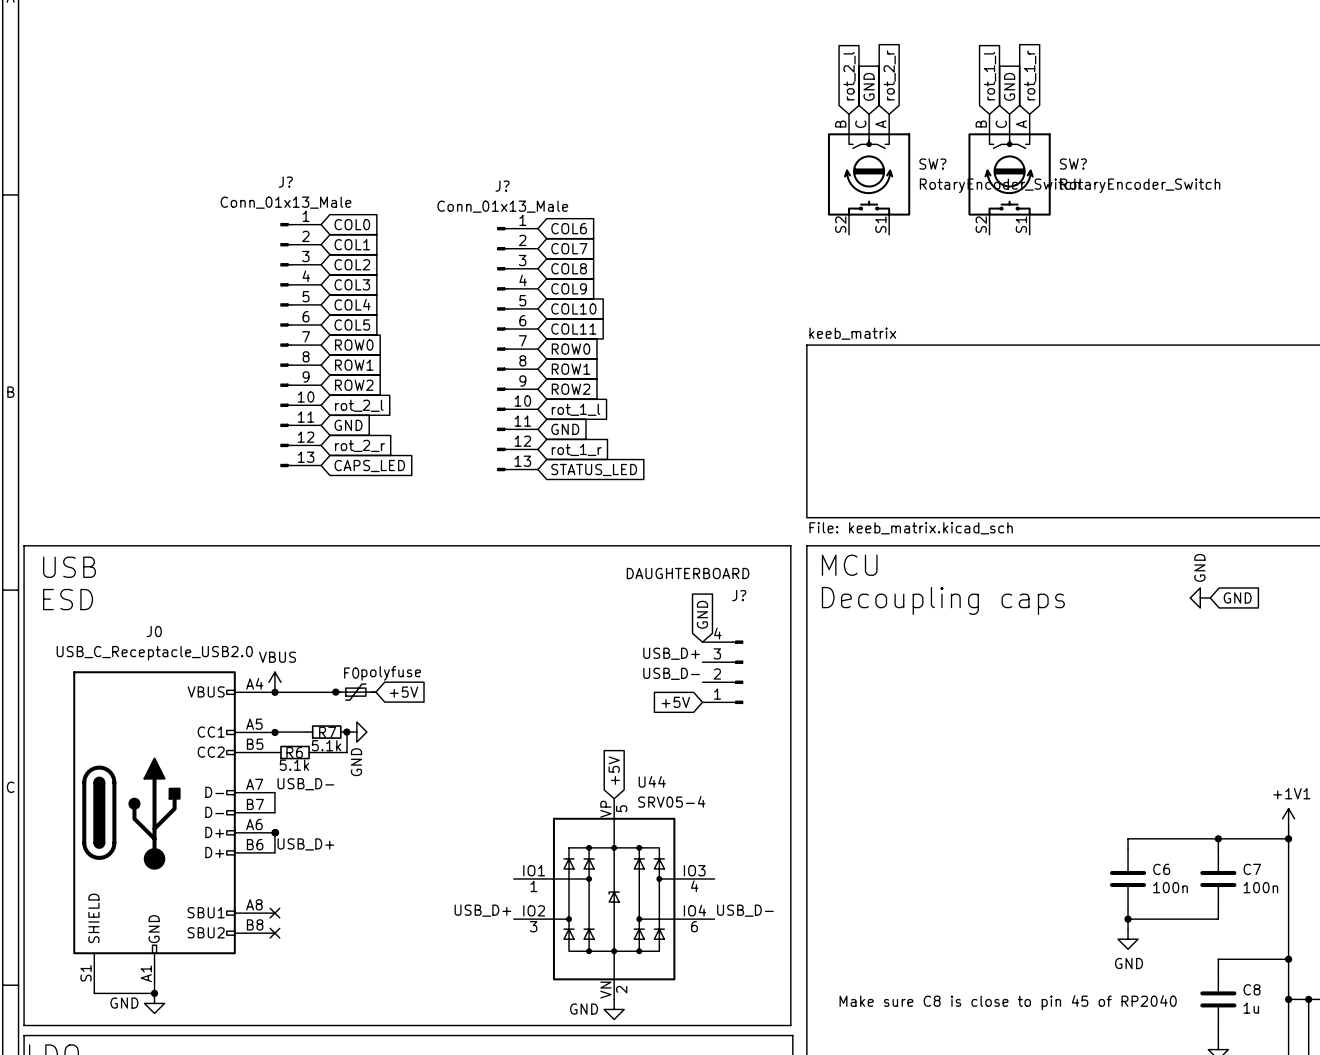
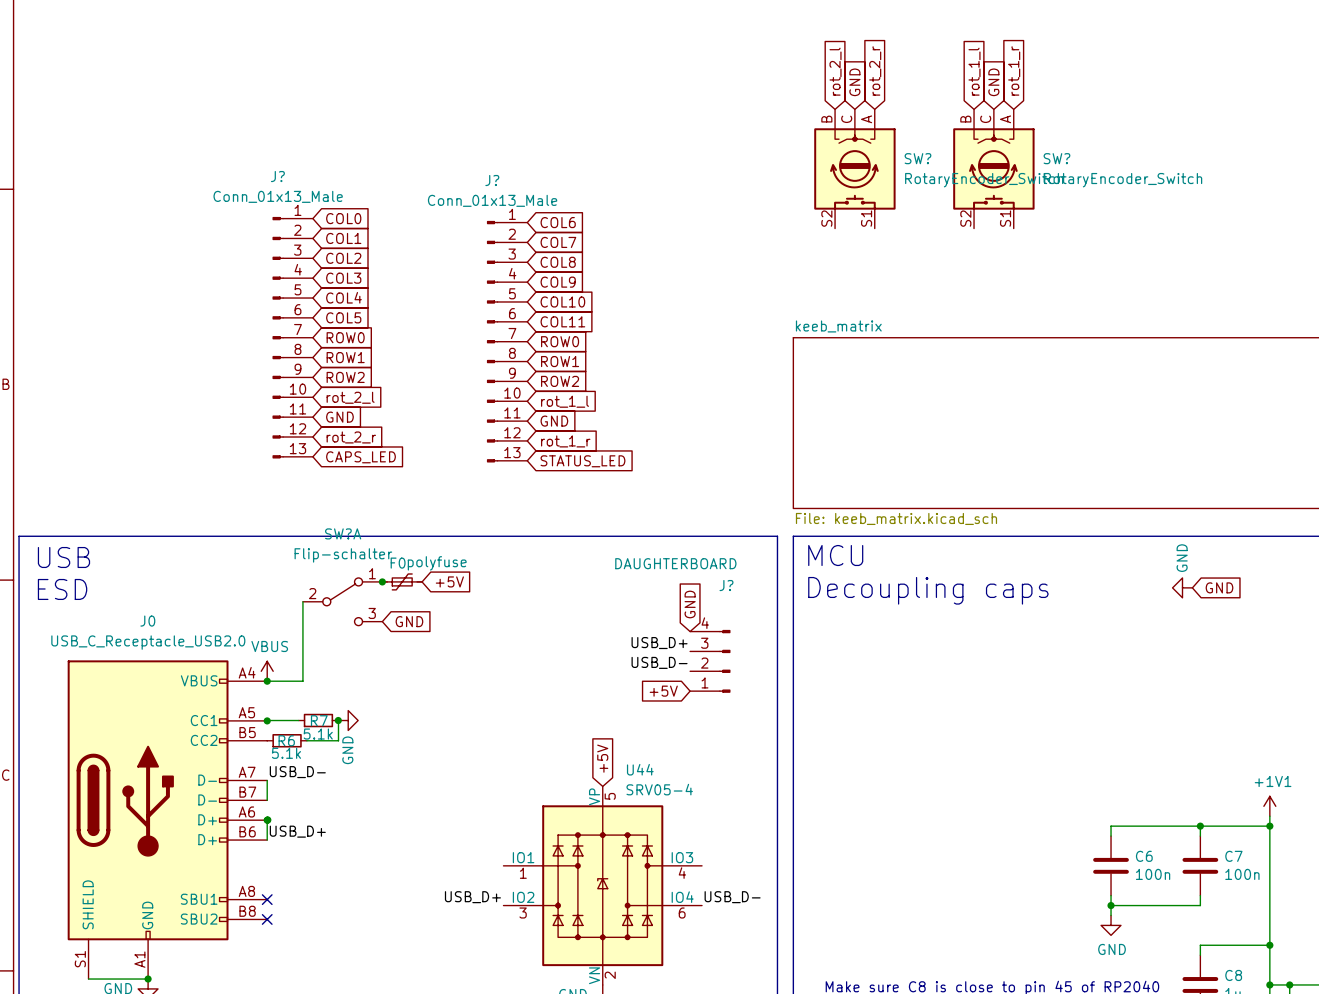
junction: none -> (382, 581)
SW?A: none -> Flip-schalter (342, 601)
global label: none -> GND (409, 621)
wire: (335, 692) (311, 692) -> (302, 601) (302, 681)
junction: (335, 692) -> none
F0 position: (355, 692) -> (402, 581)
global label position: +5V (404, 692) -> +5V (449, 581)

